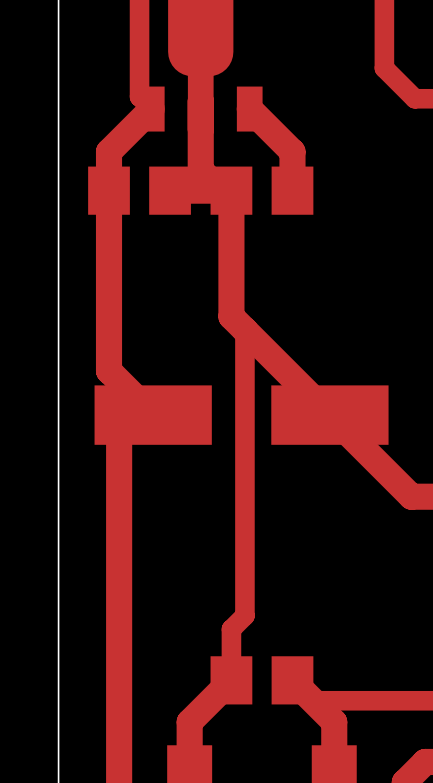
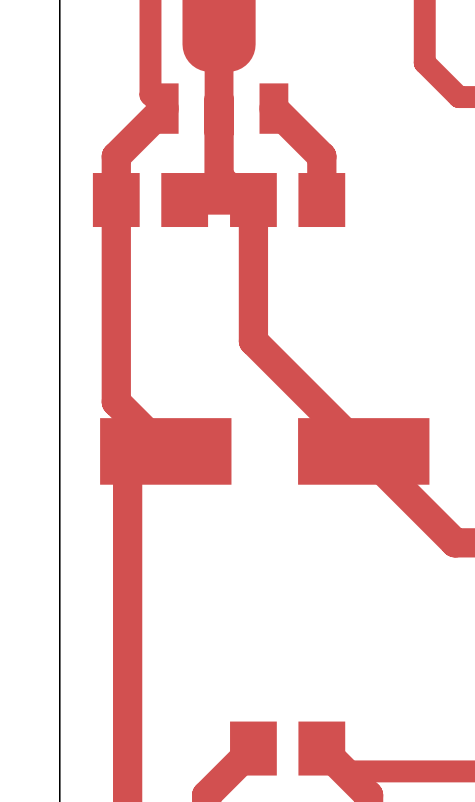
top track: (244, 330) (244, 615) (231, 629) (231, 680) -> none

